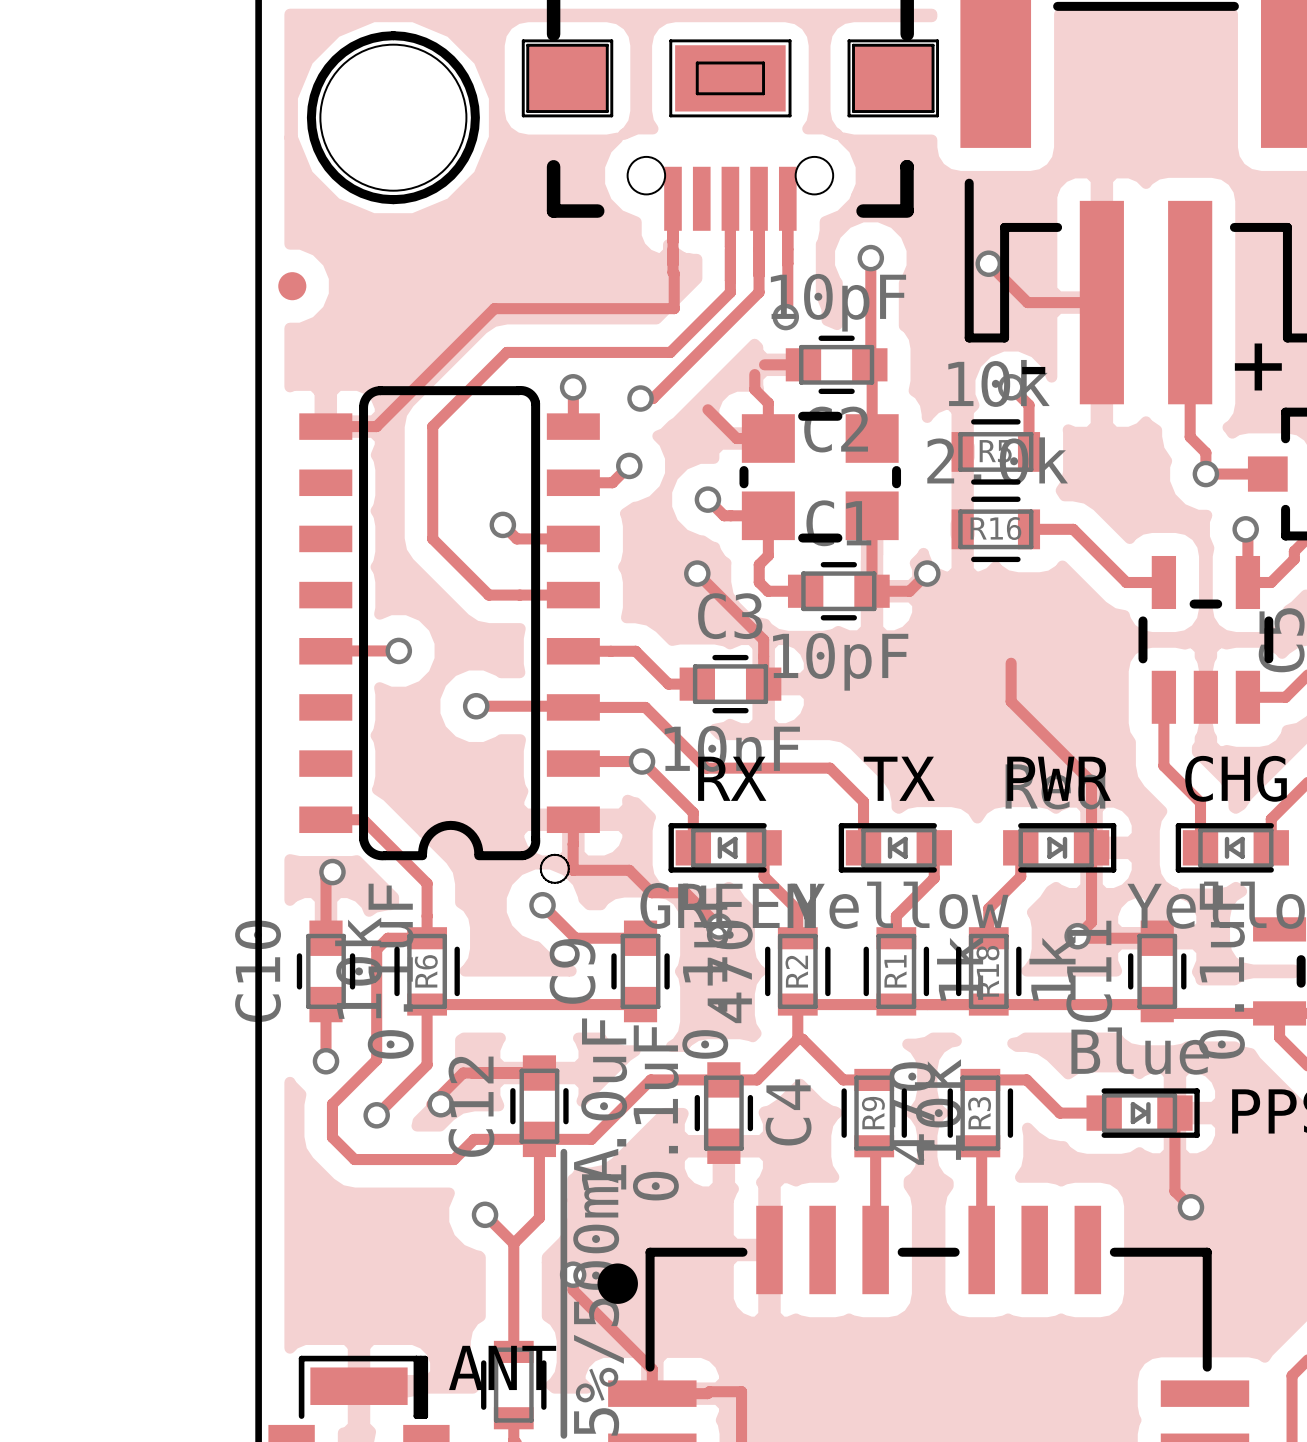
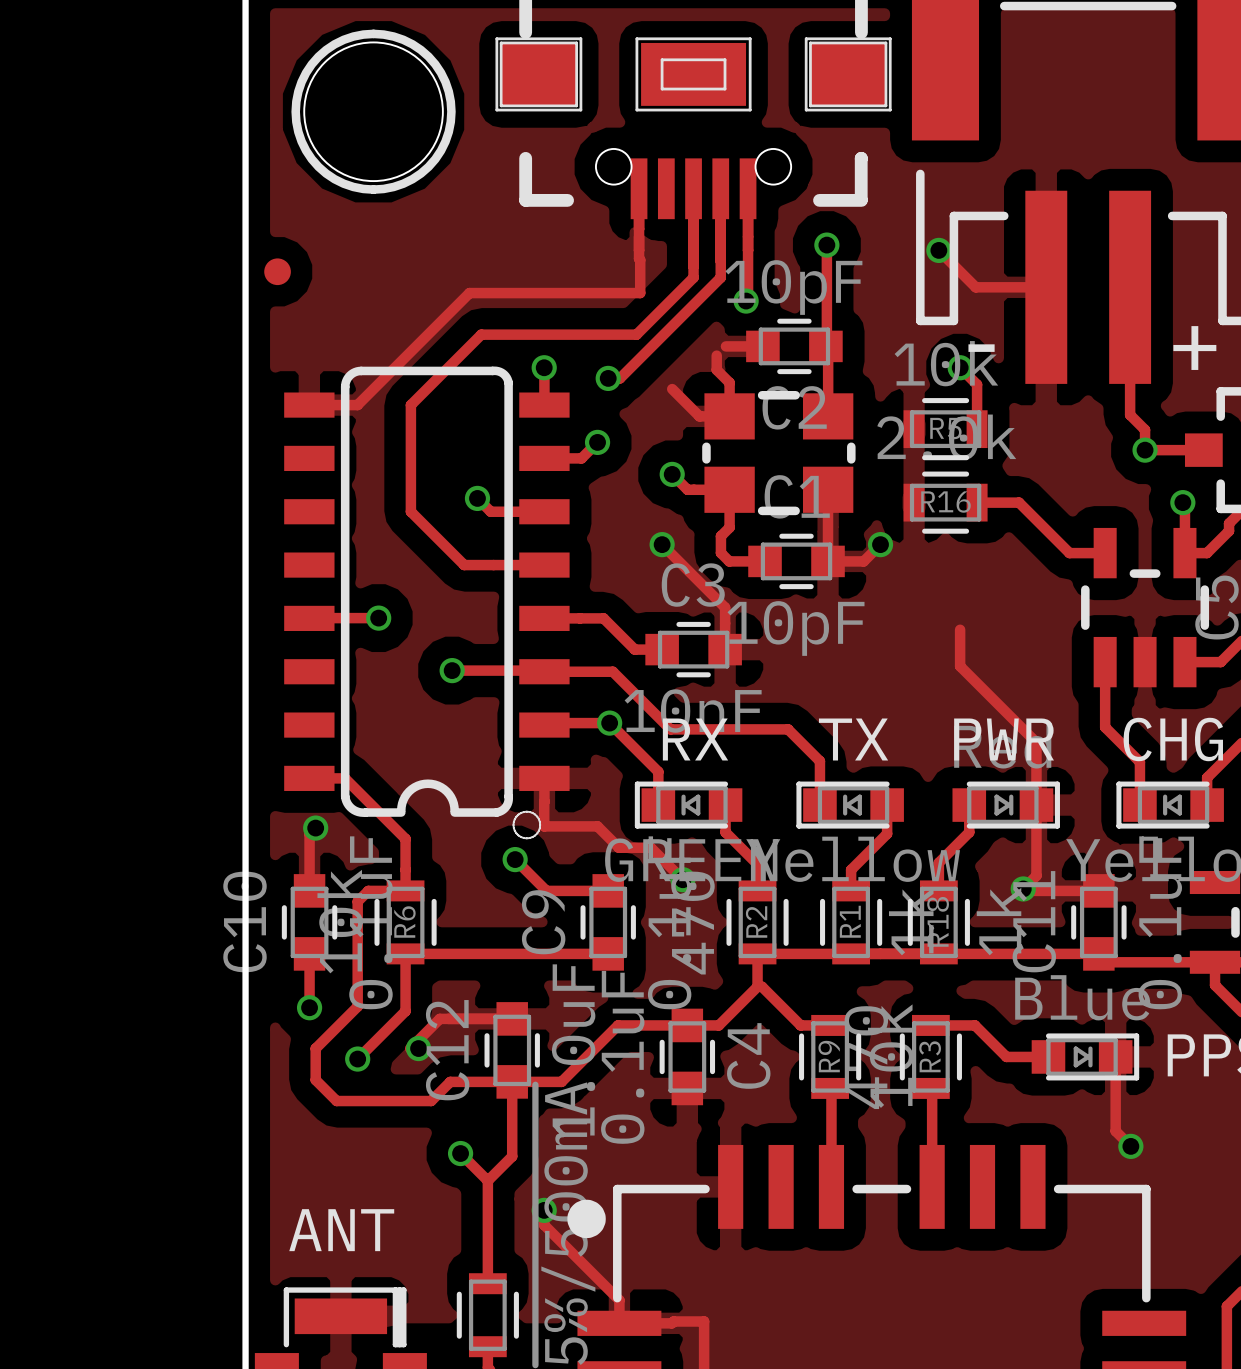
text position: ANT (502, 1367) -> ANT (341, 1230)

